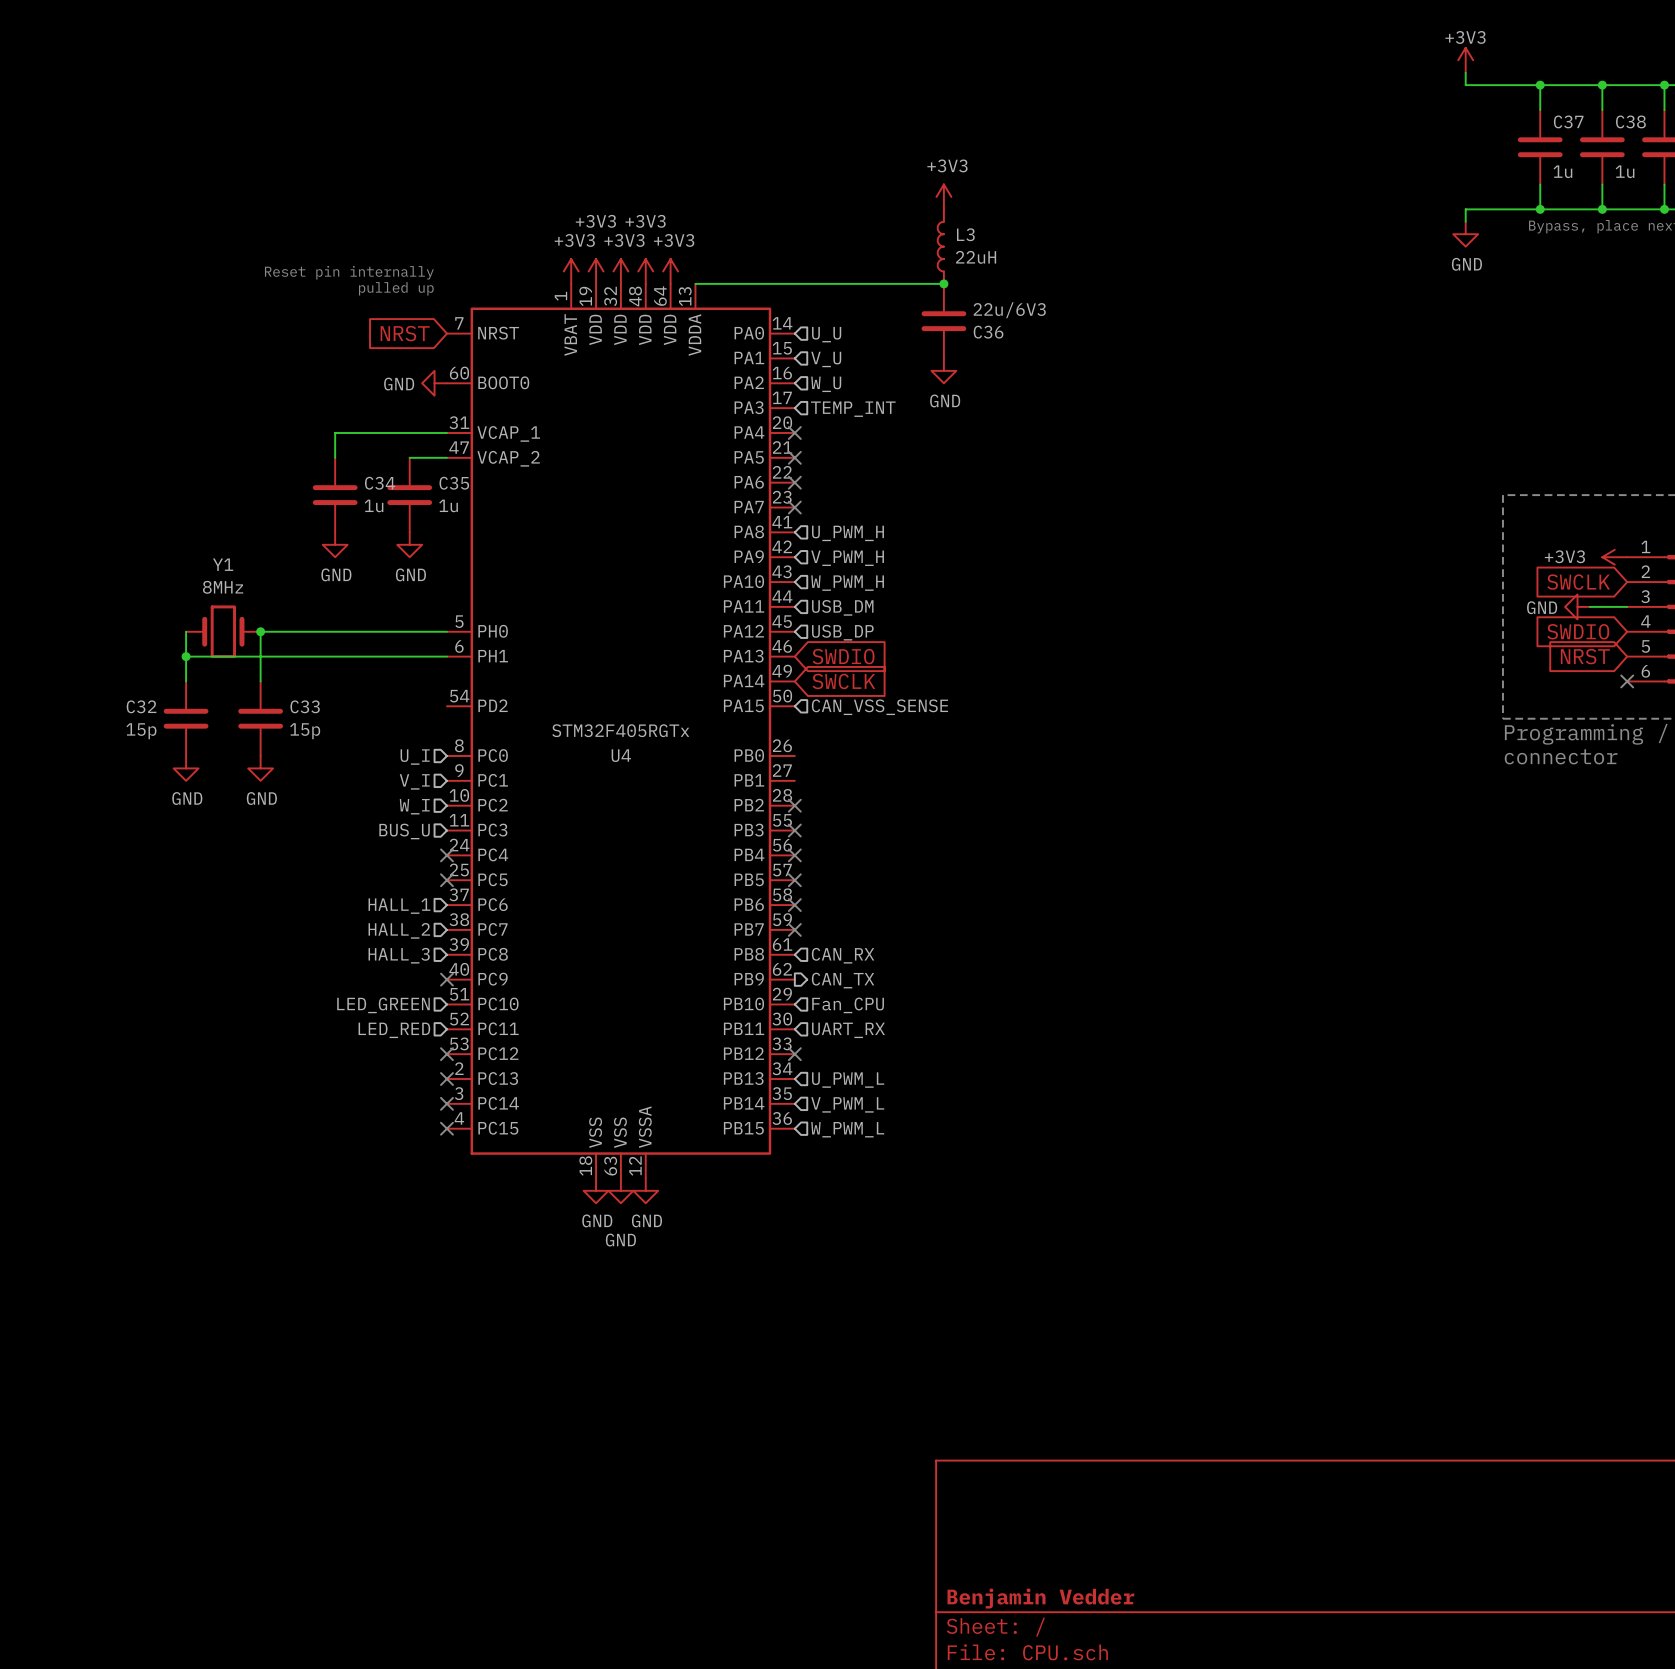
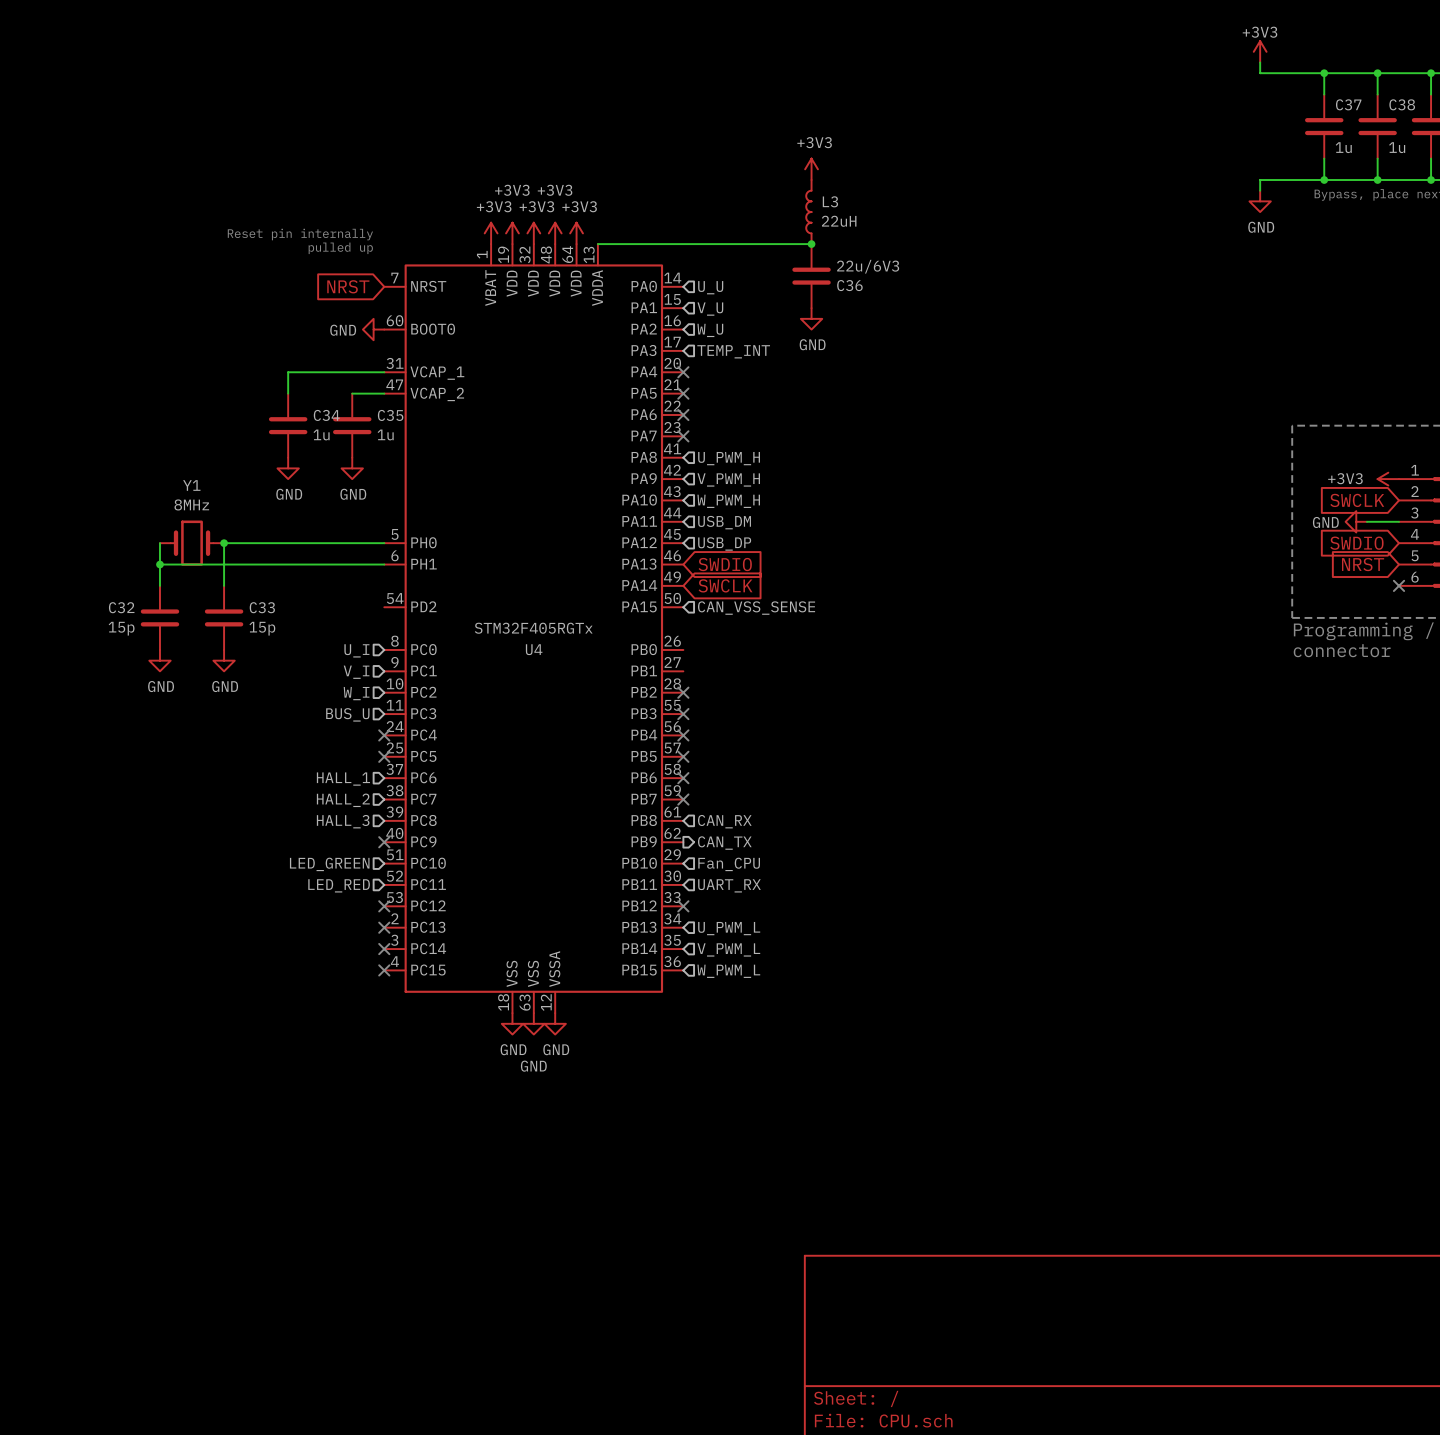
title block: Benjamin Vedder (1040, 1598) -> none

